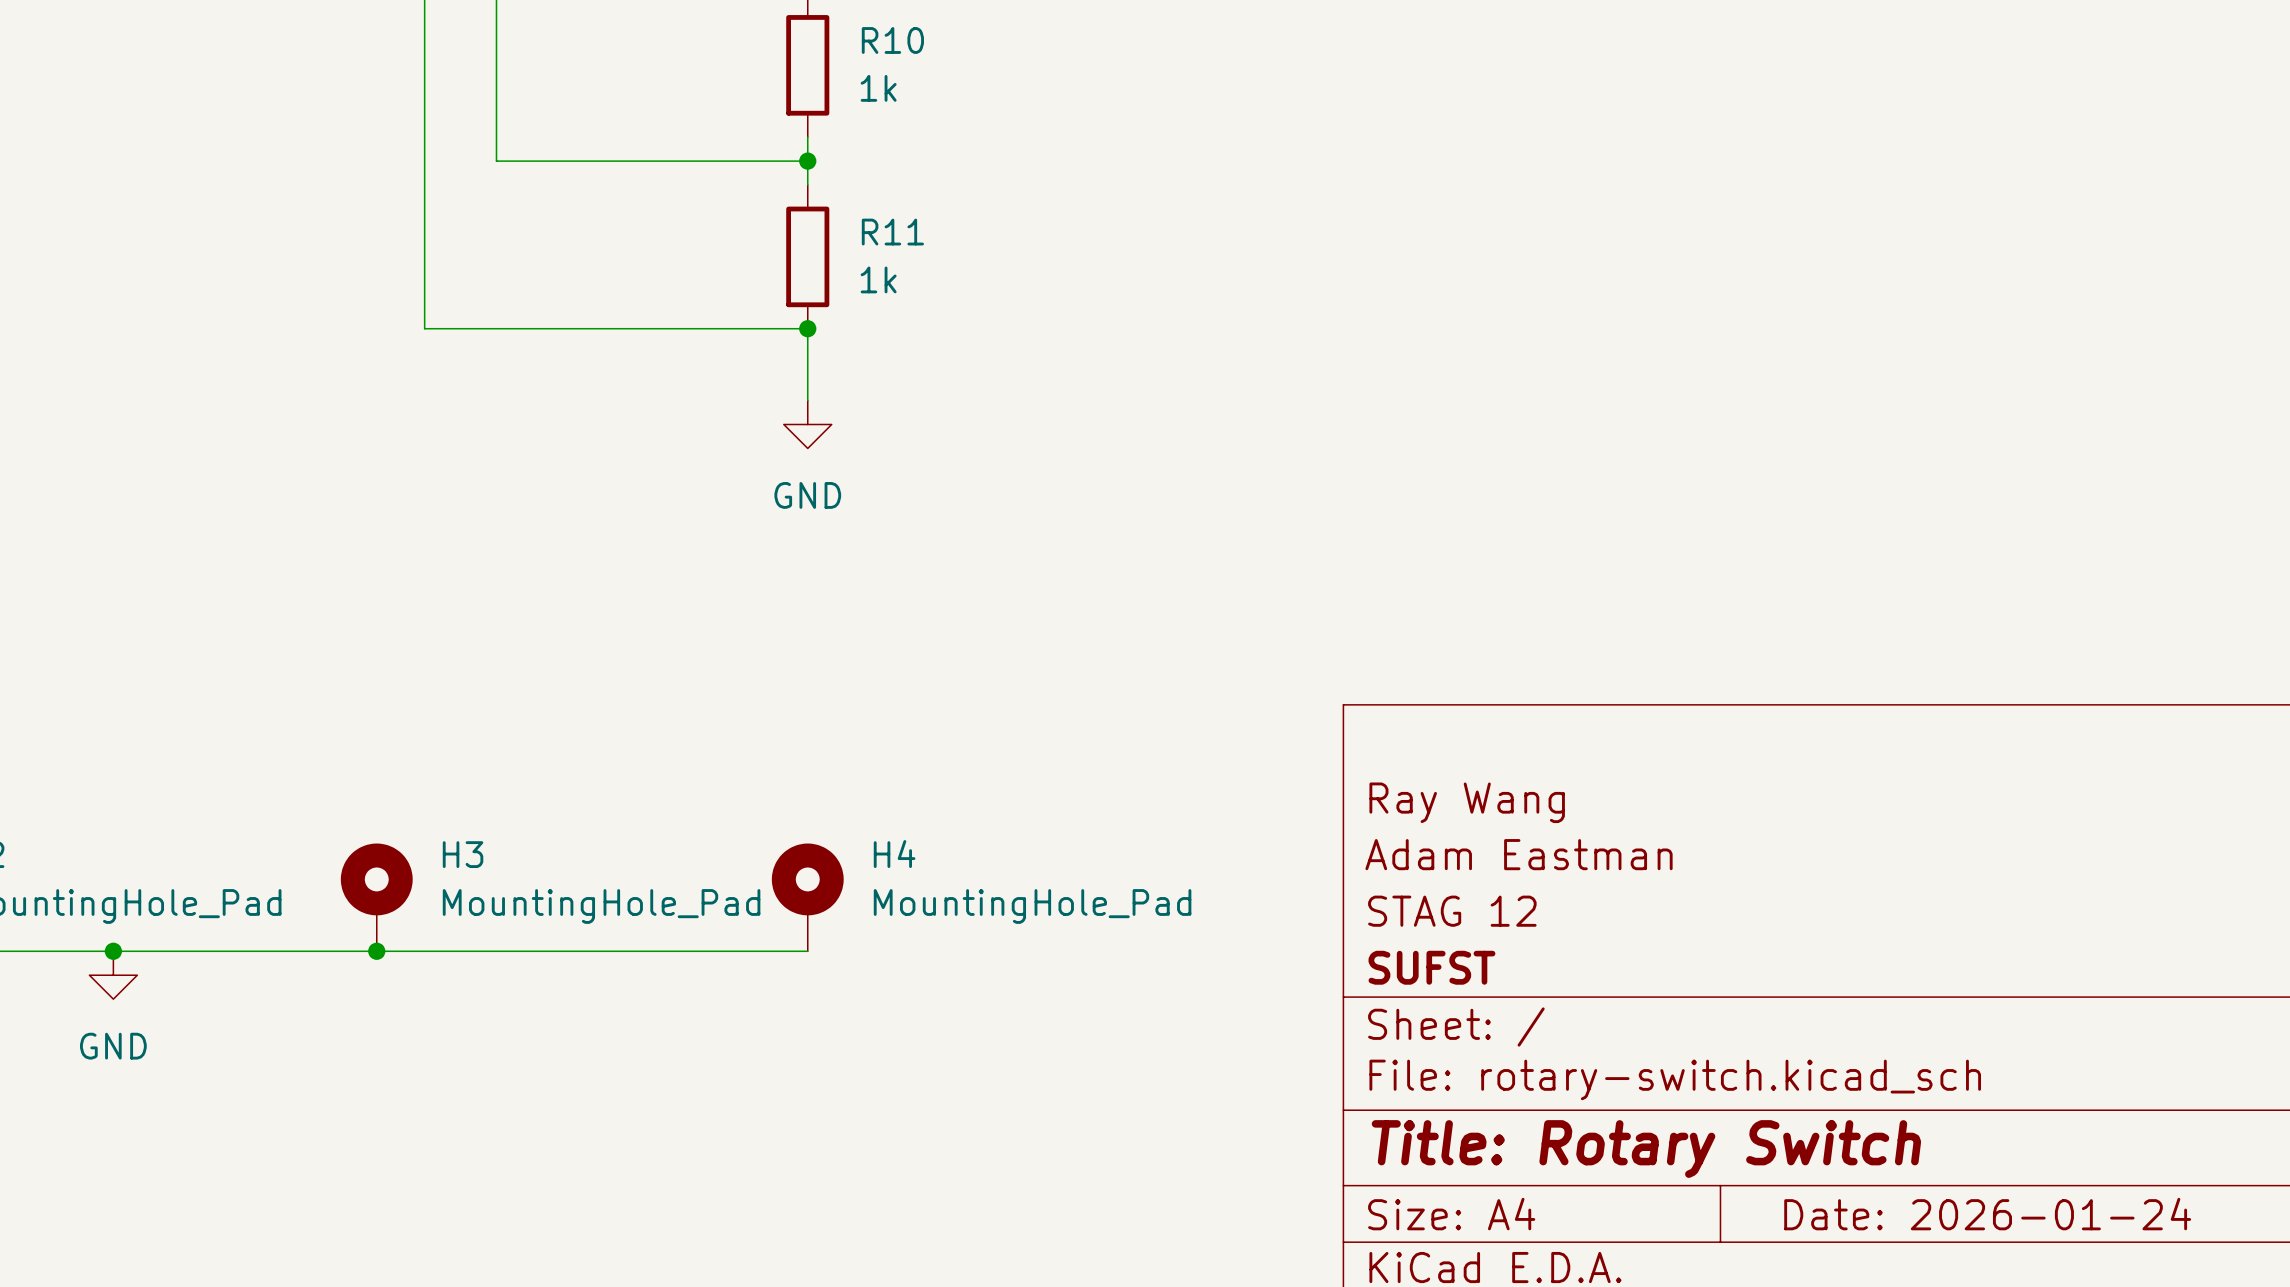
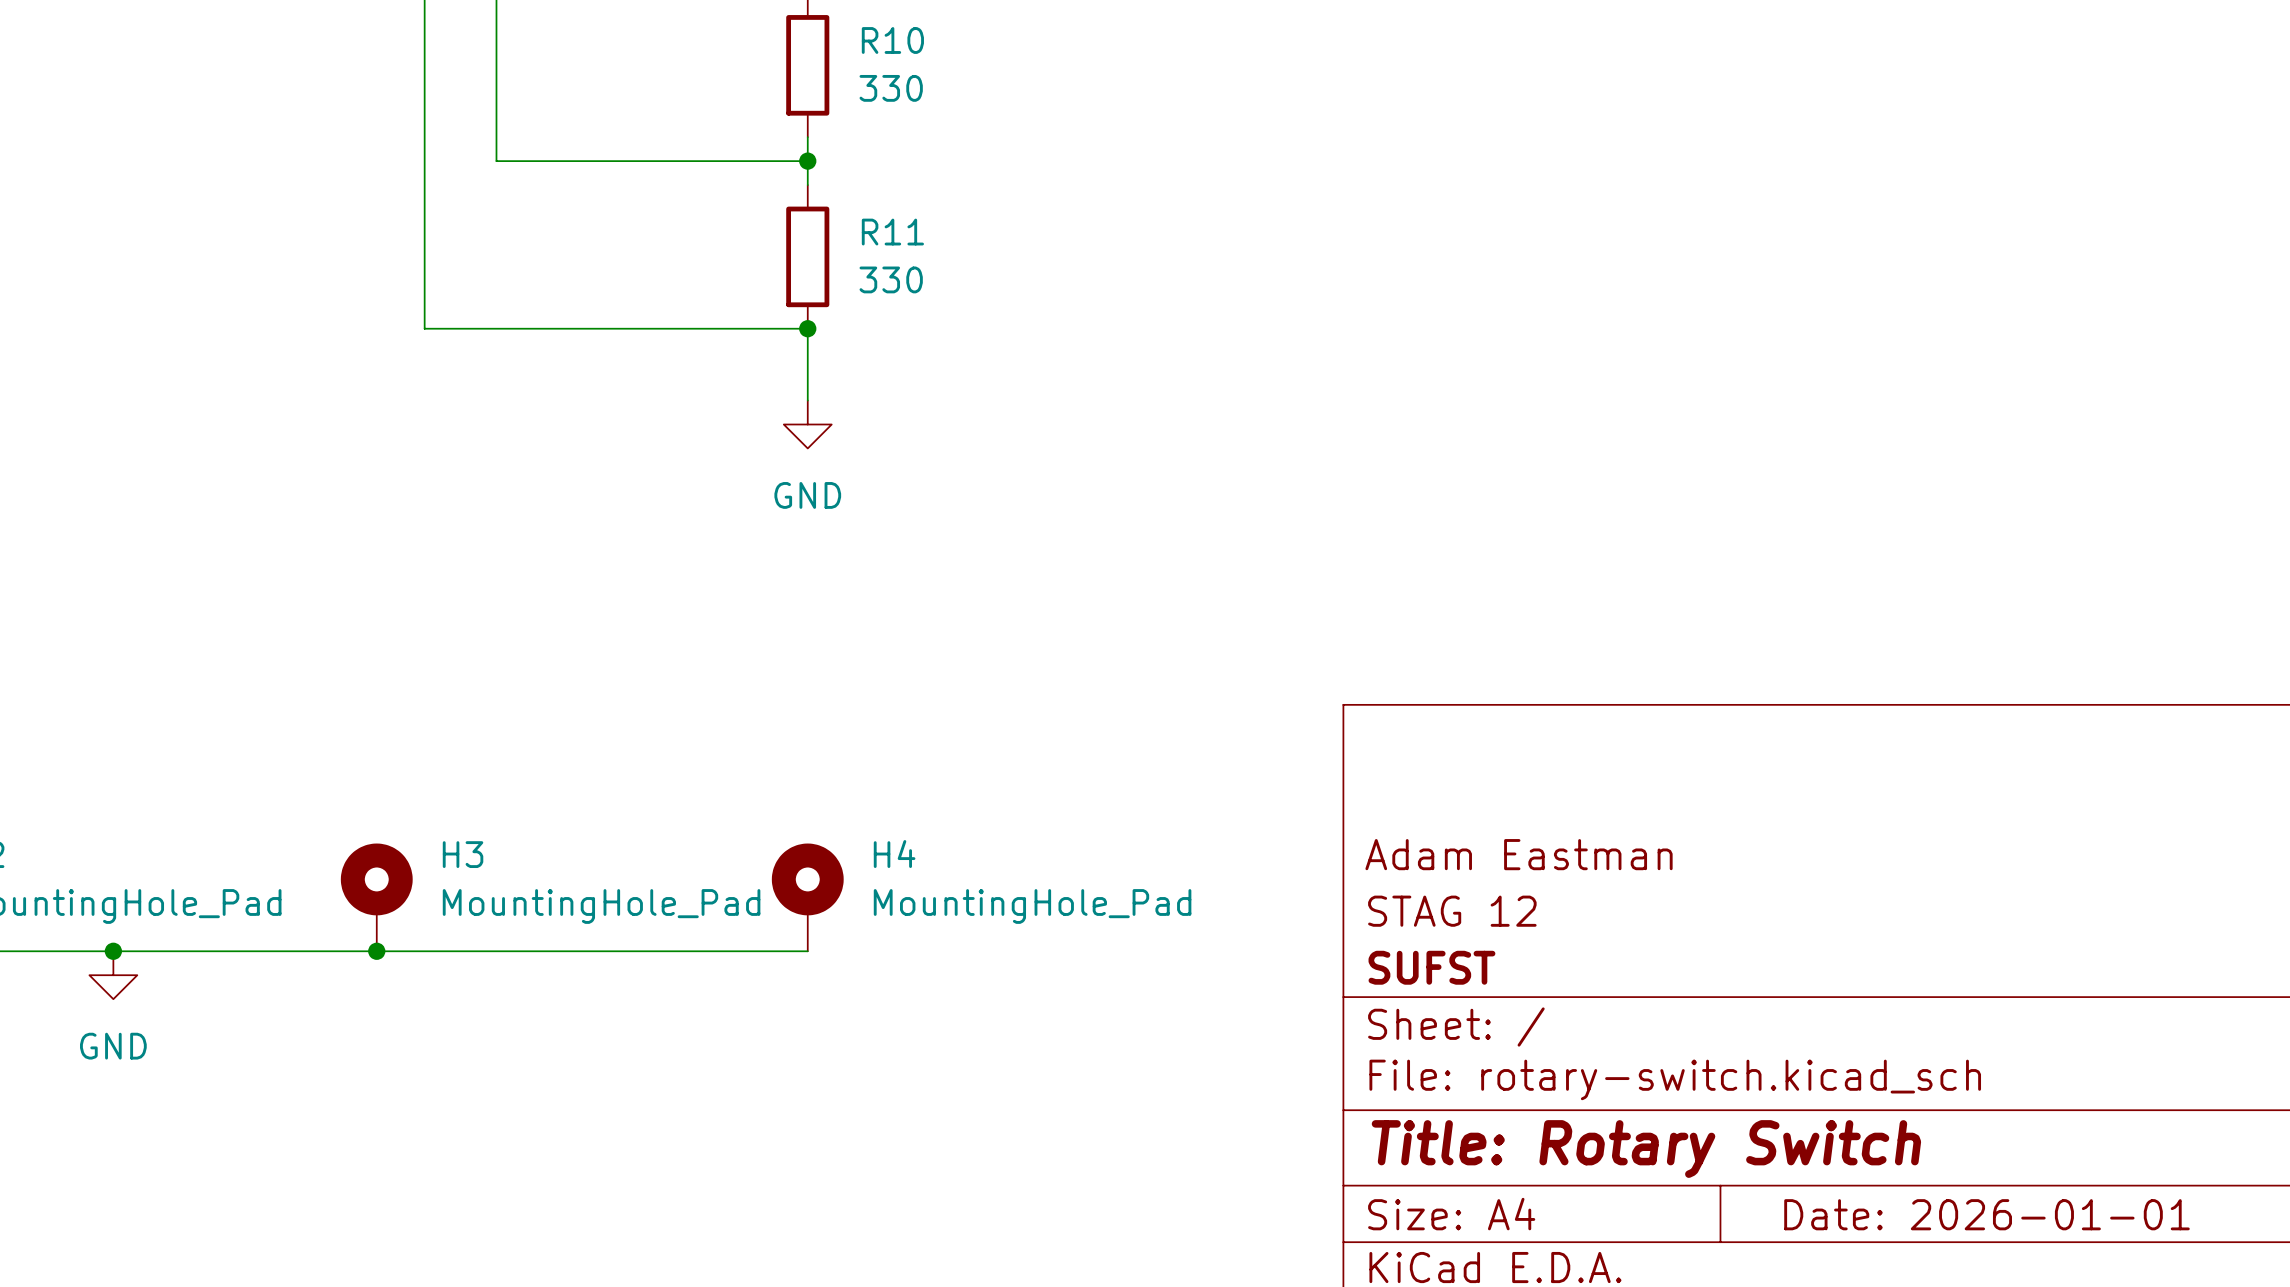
R10 value: 1k (878, 88) -> 330 (891, 88)
R11 value: 1k (878, 279) -> 330 (891, 279)
title block: Ray Wang (1467, 802) -> none
title block: Date: 2026-01-24 (1987, 1214) -> Date: 2026-01-01 (1986, 1214)

